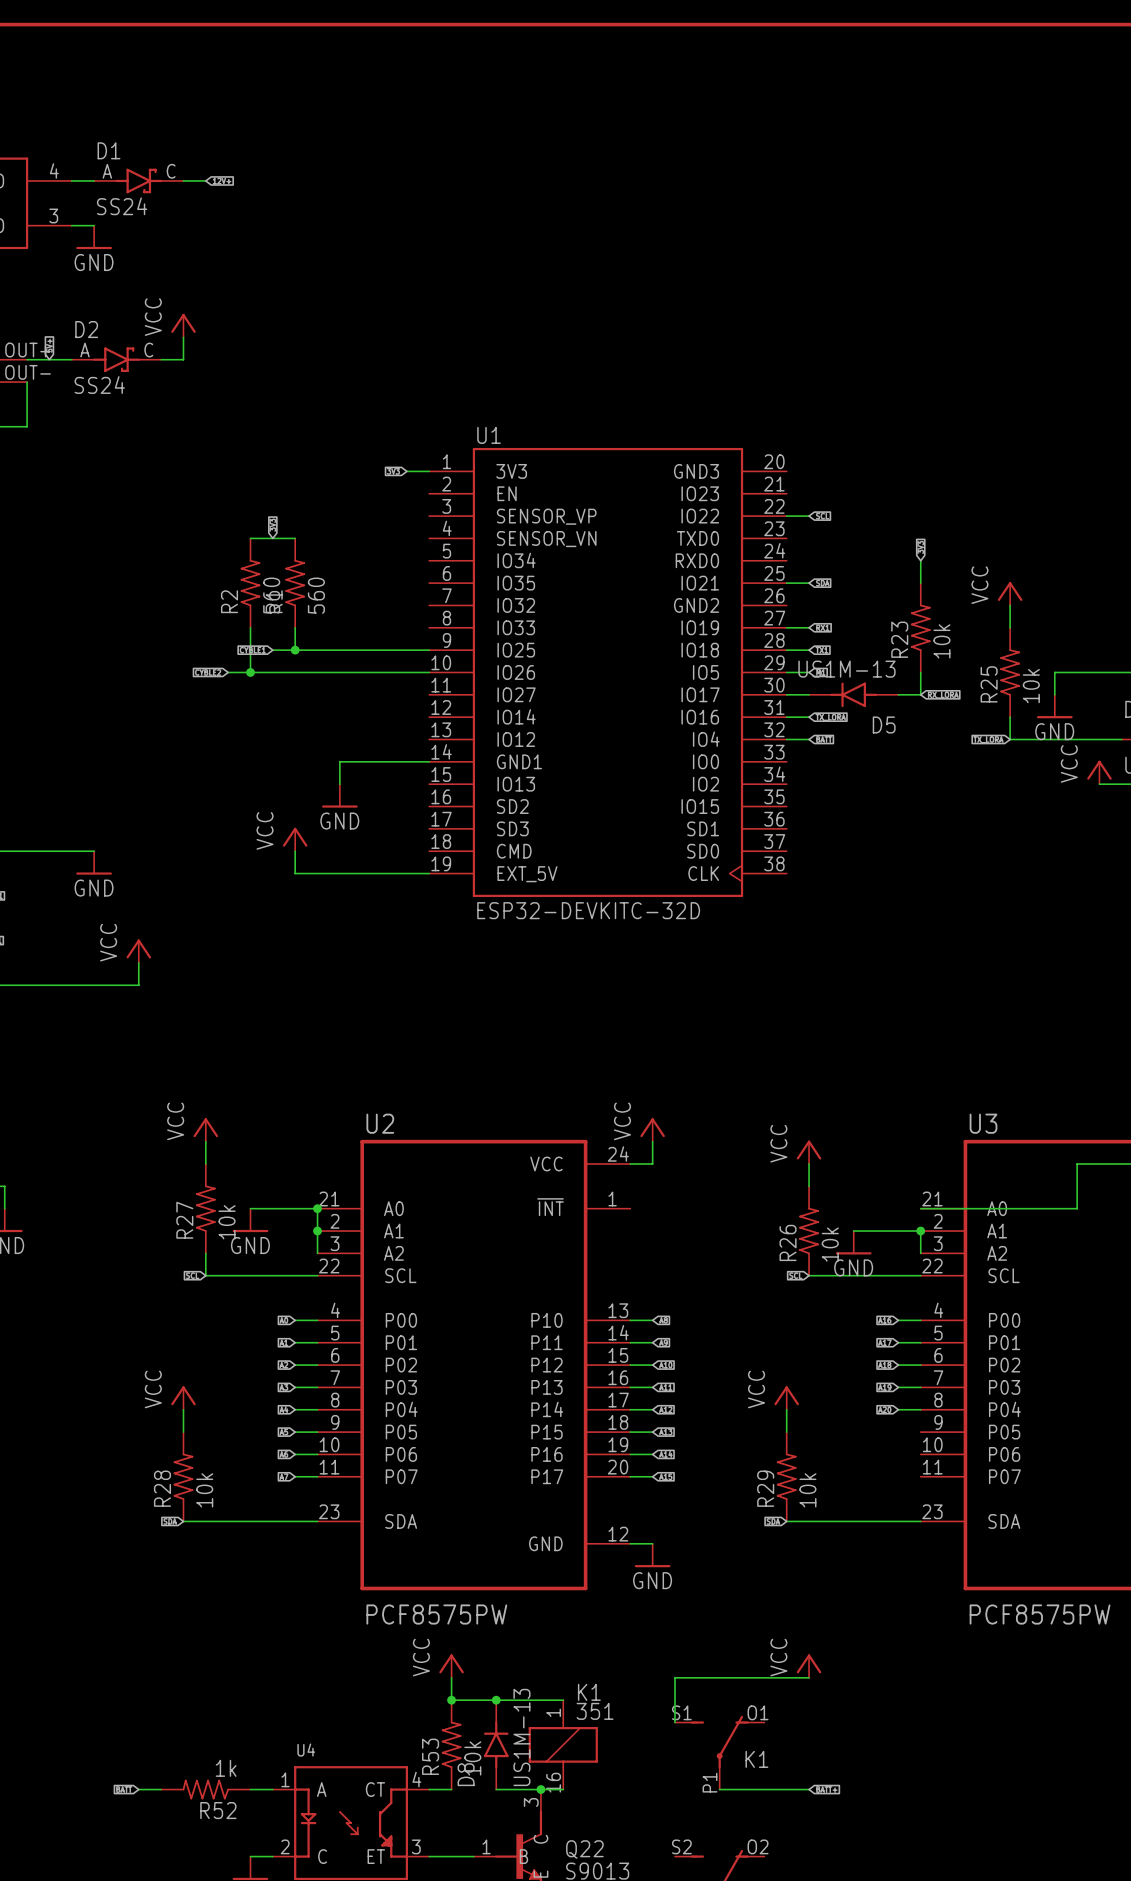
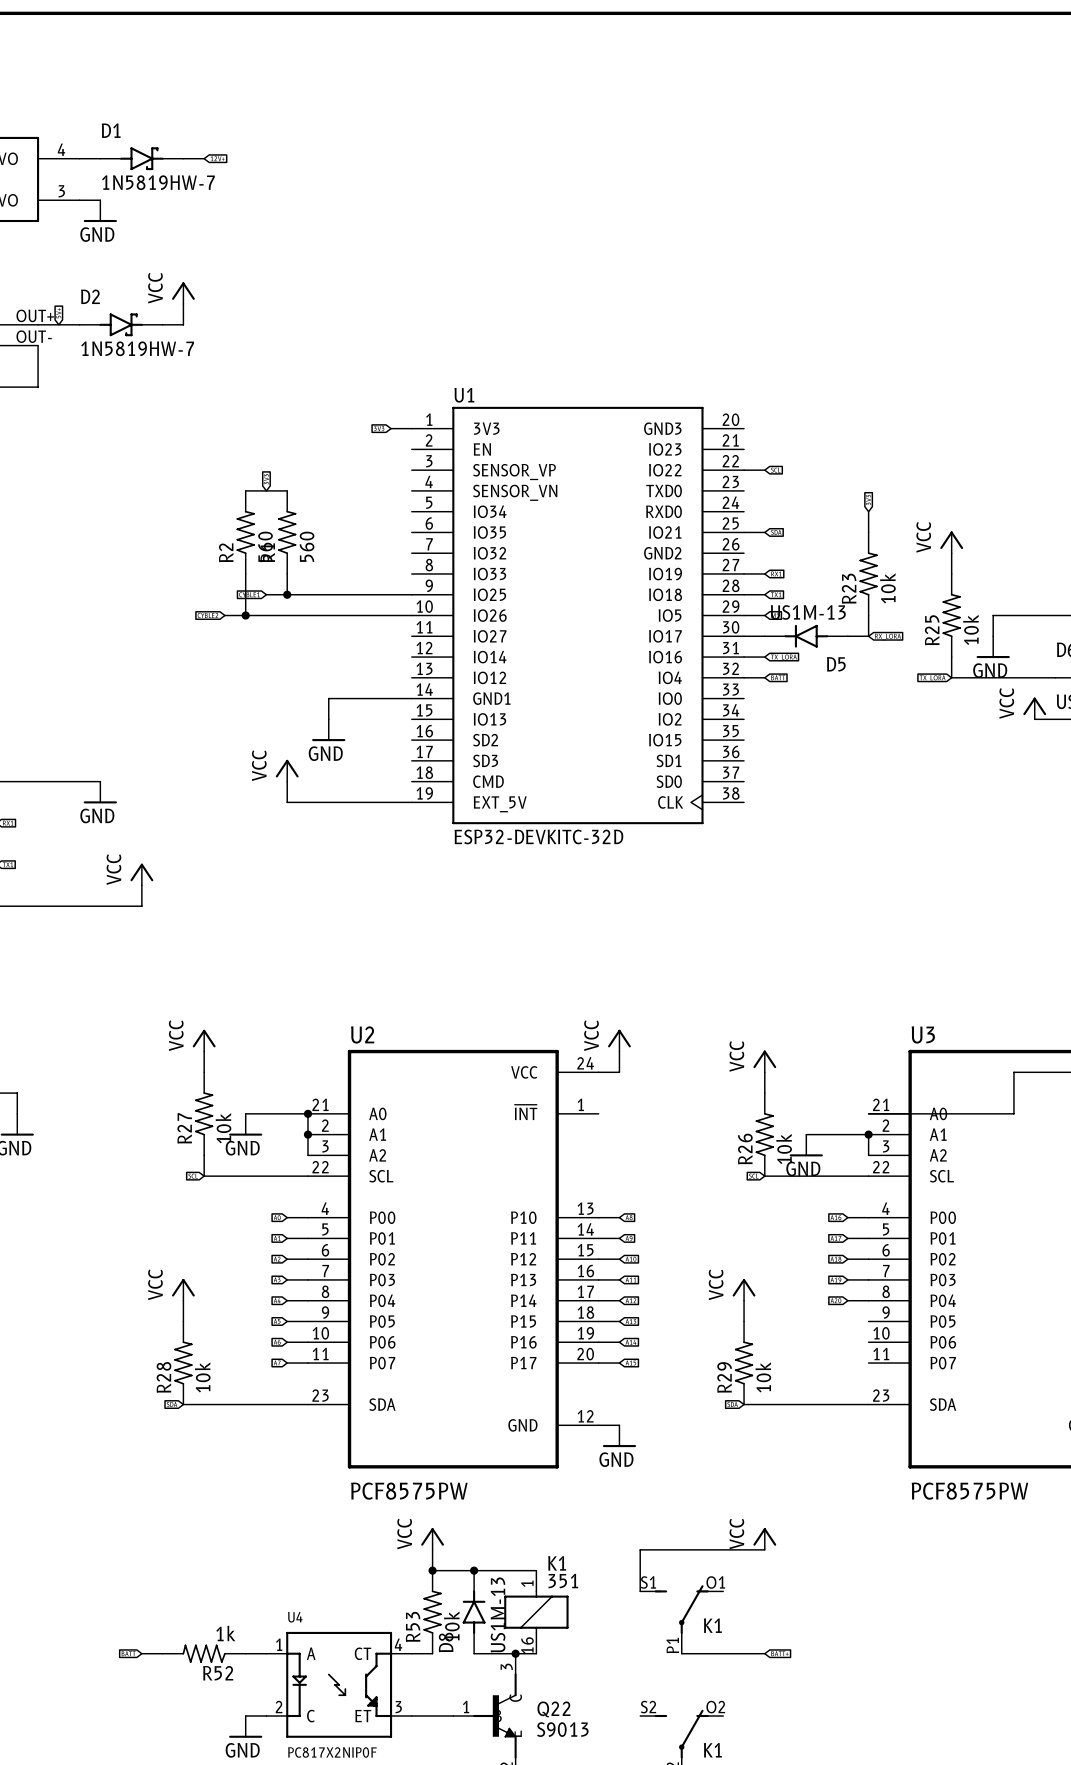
D1 pin number: A (107, 171) -> none
D1 pin number: C (171, 171) -> none
D1 value: SS24 (122, 206) -> 1N5819HW-7 (158, 182)
D2 pin number: A (84, 350) -> none
D2 pin number: C (148, 350) -> none
D2 value: SS24 (99, 385) -> 1N5819HW-7 (137, 348)

